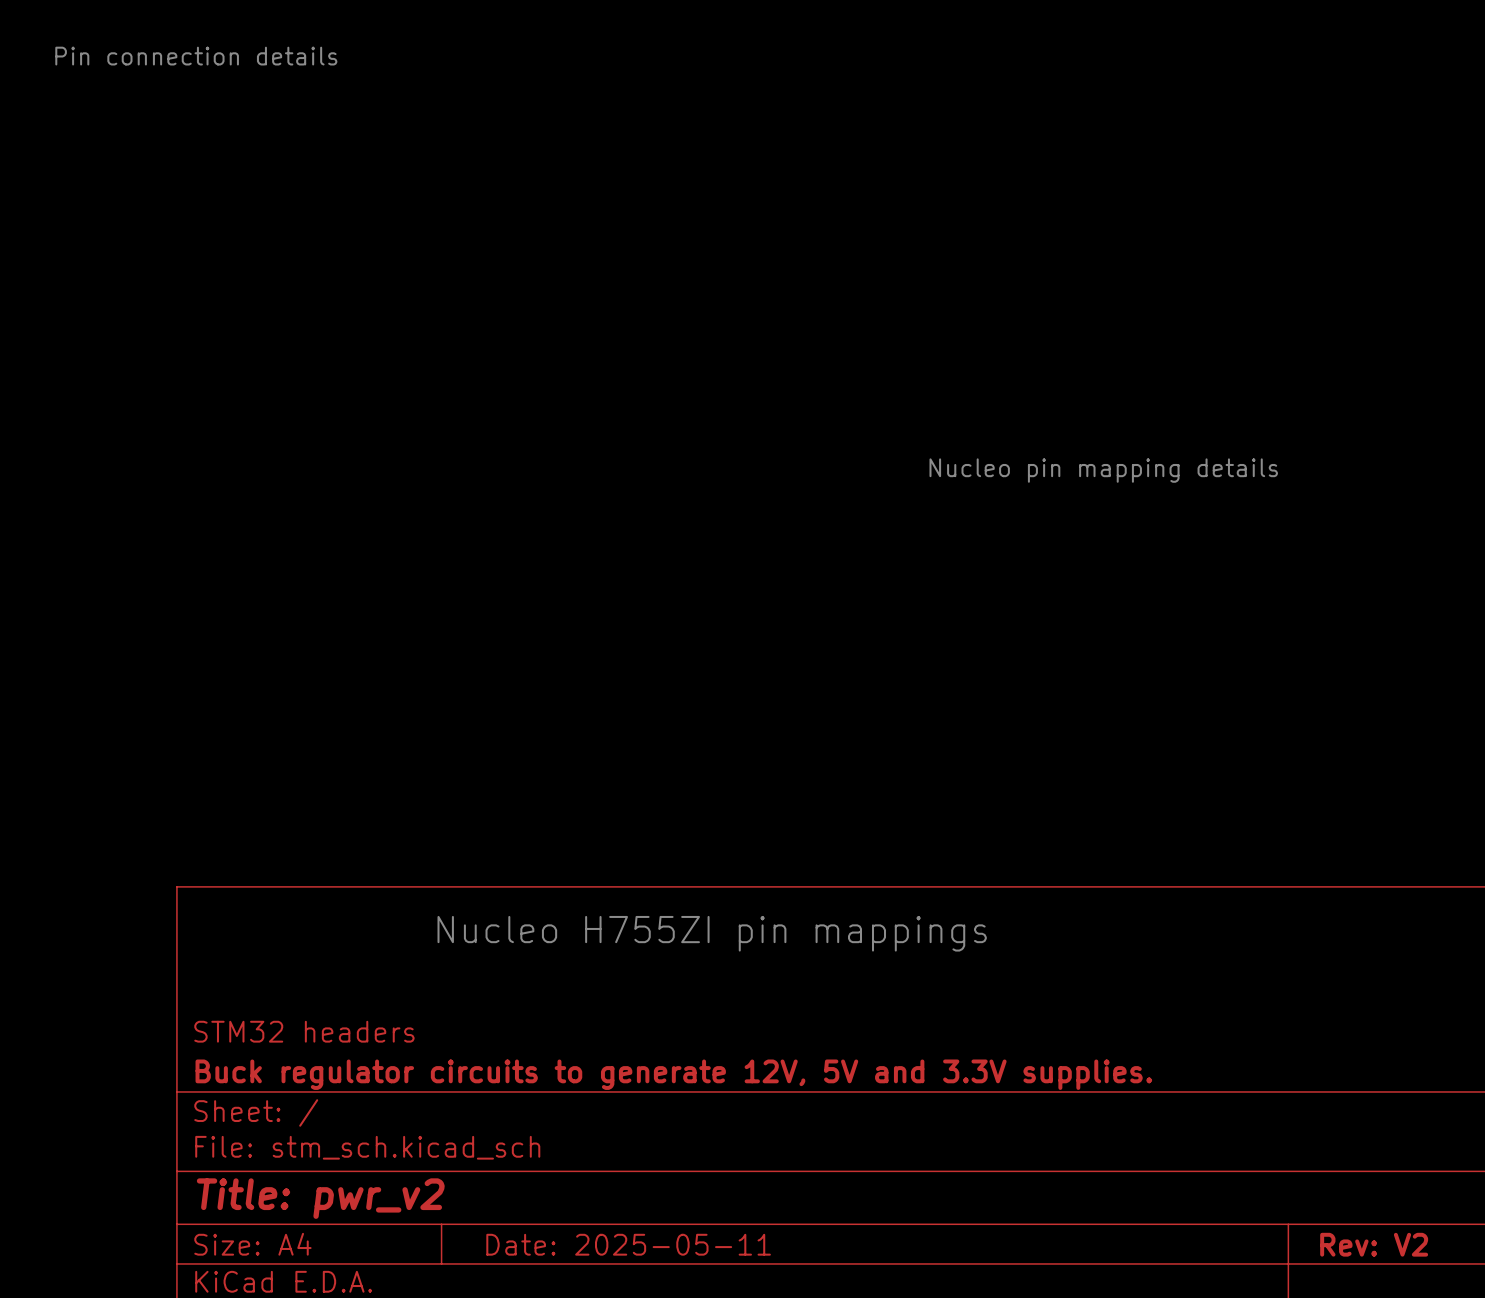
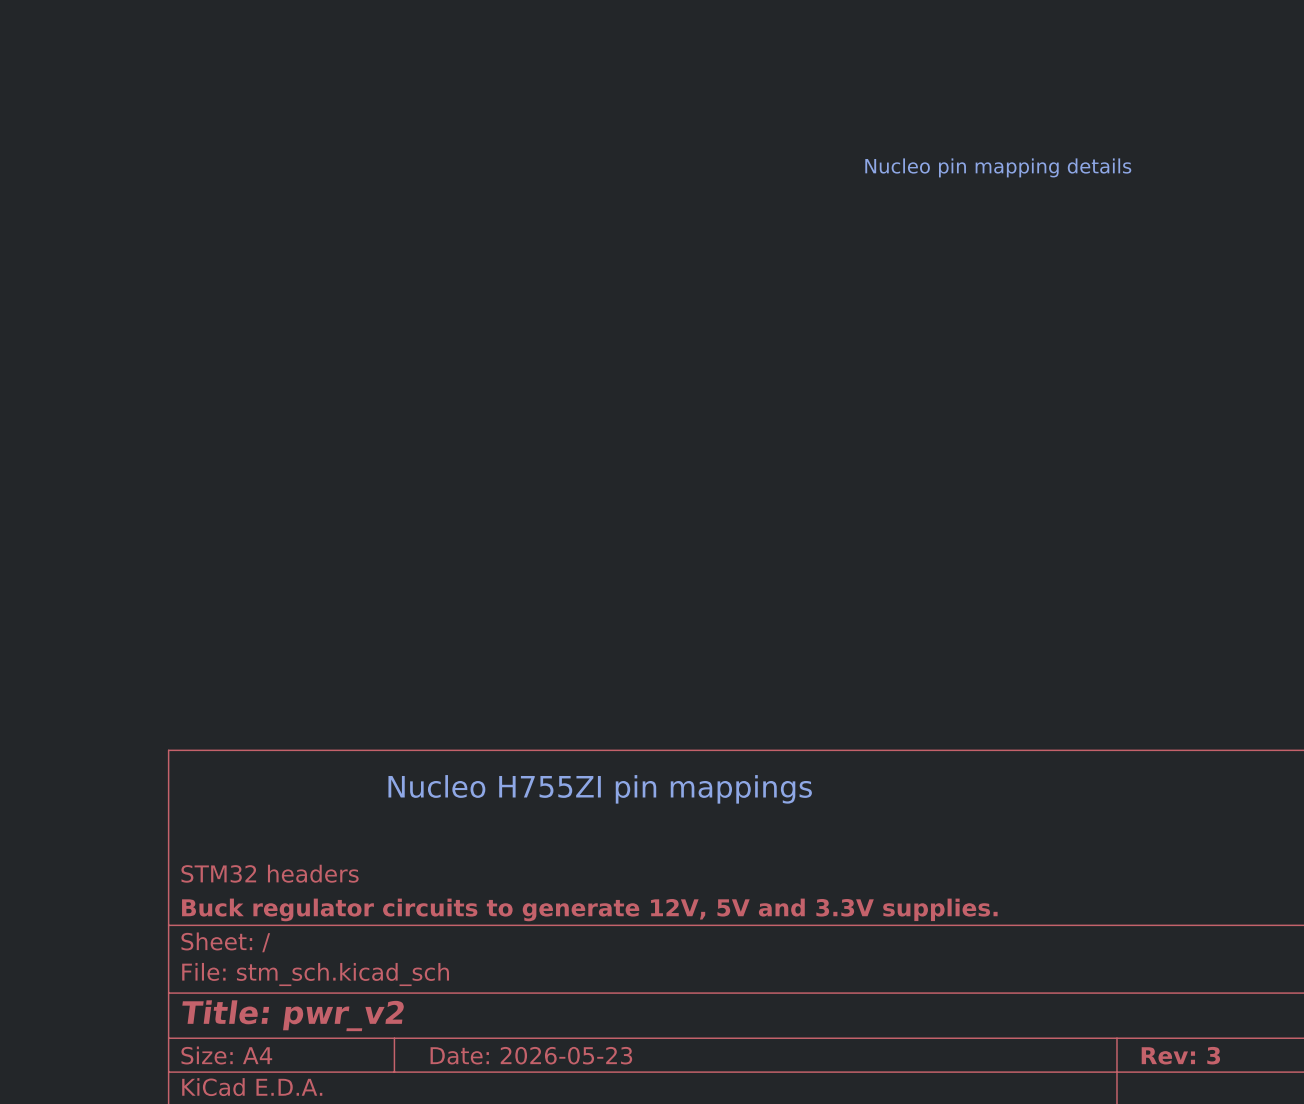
text: Pin connection details (196, 56) -> none
text position: Nucleo pin mapping details (1103, 470) -> Nucleo pin mapping details (998, 167)
title block: Date: 2025-05-11 (628, 1244) -> Date: 2026-05-23 (531, 1055)
title block: Rev: V2 (1374, 1244) -> Rev: 3 (1180, 1055)

